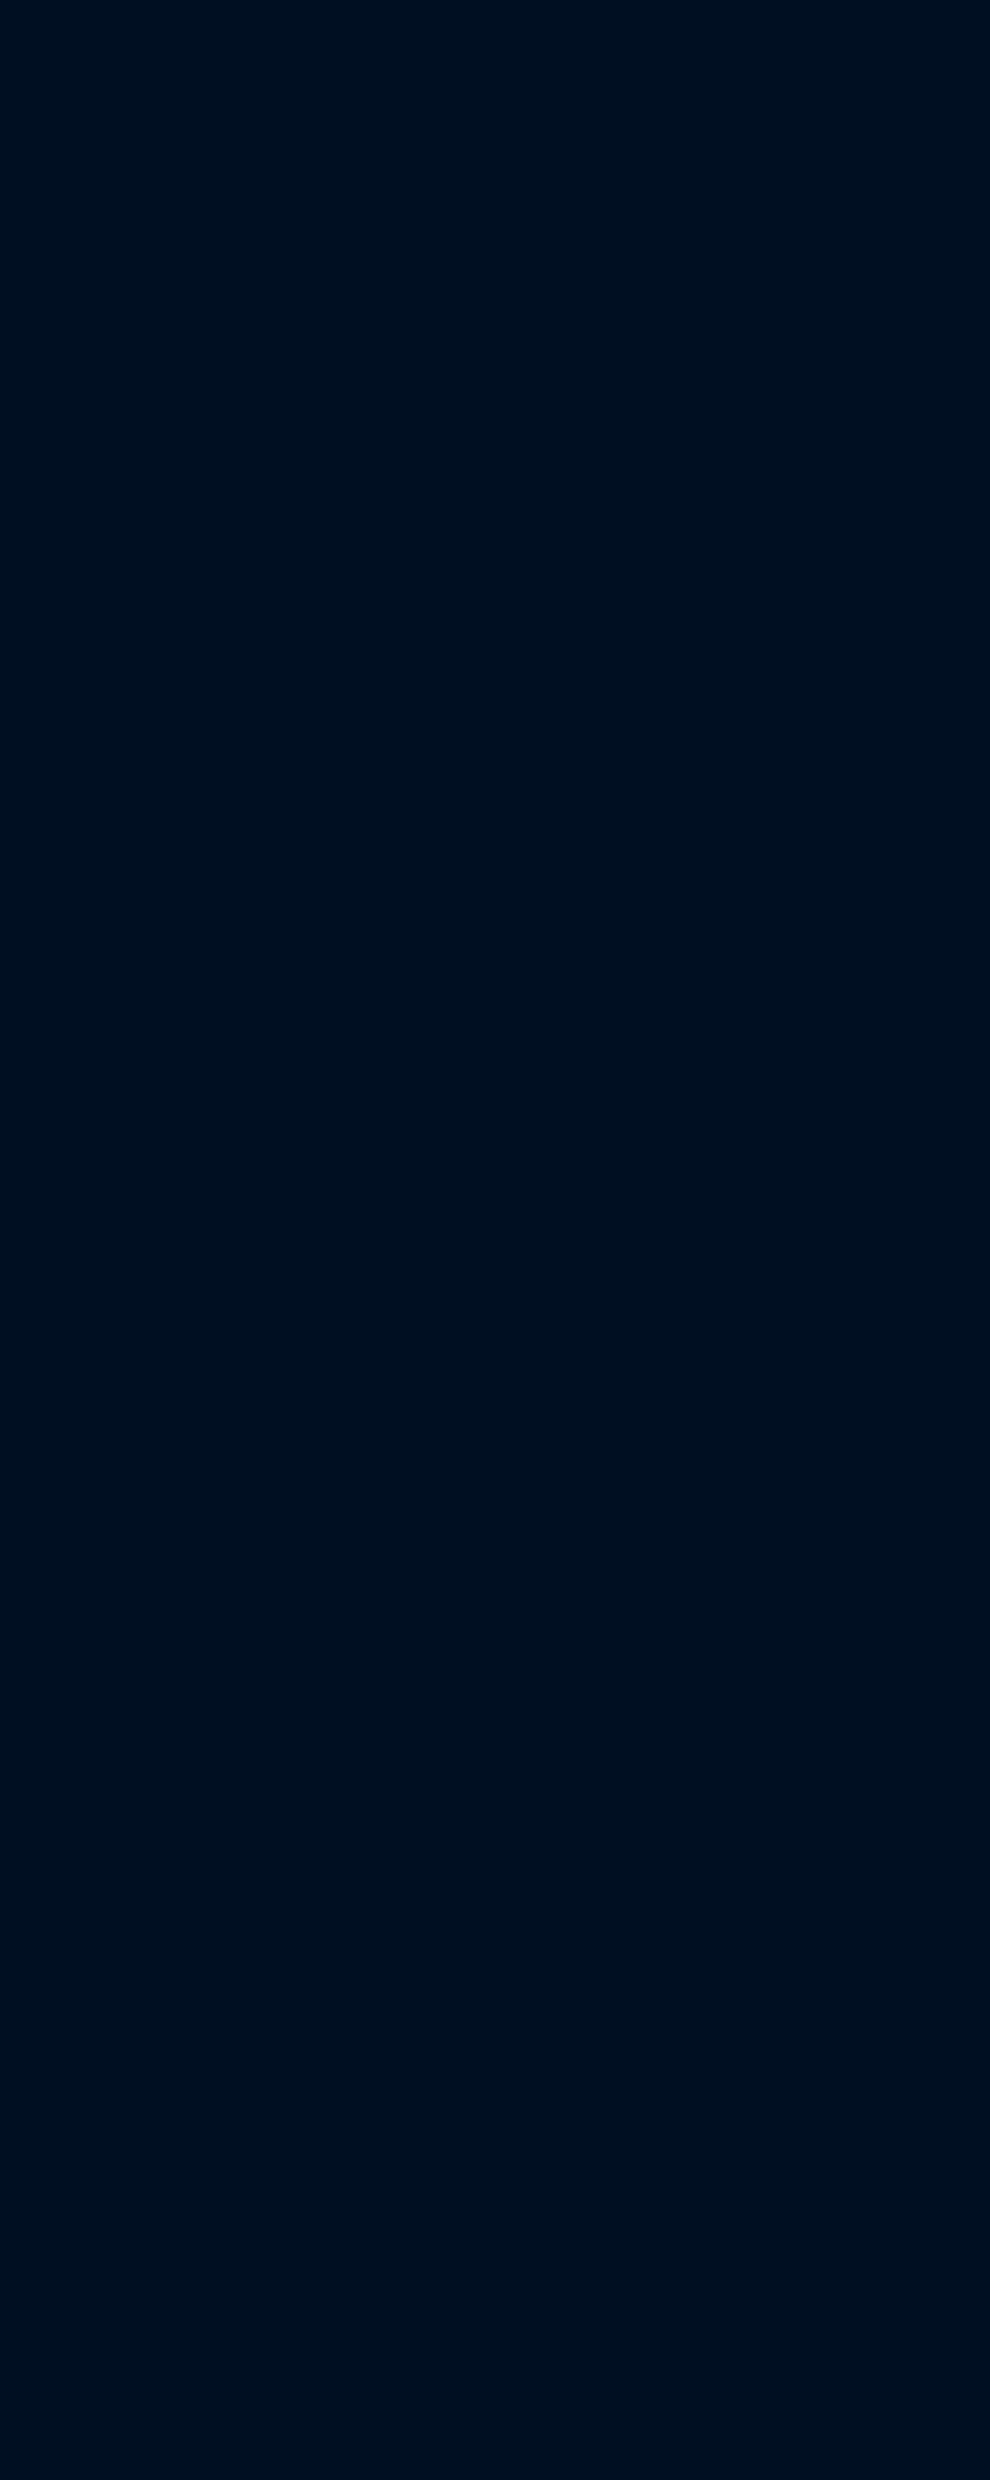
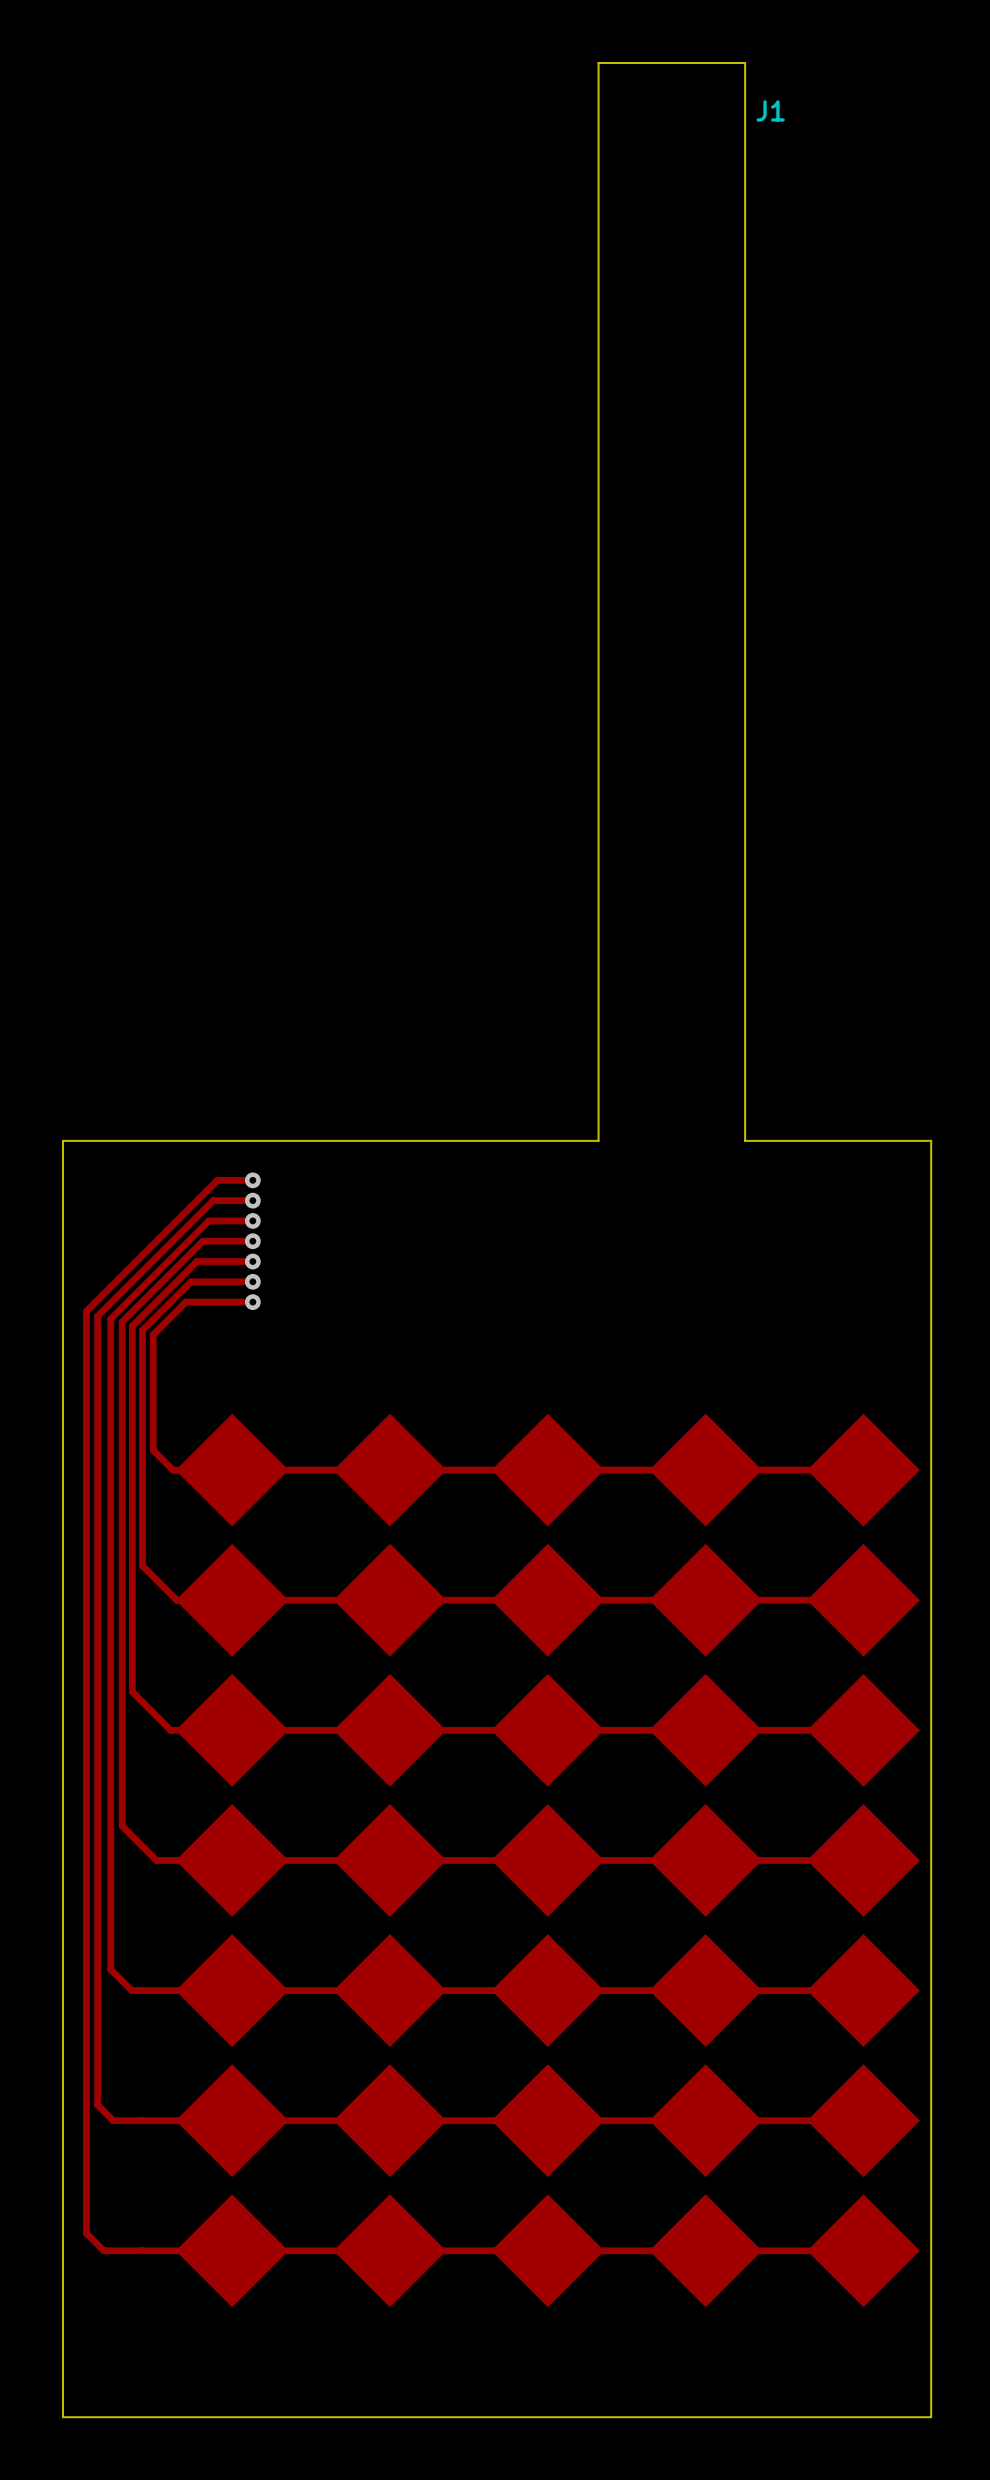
board edge: none -> (598, 62) (745, 62) (745, 1140) (931, 1140) (931, 2417) (62, 2417) (62, 1140) (598, 1140) (598, 62)
J1: none -> (770, 110)
track: none -> (252, 1180) (217, 1180) (86, 1311) (86, 2233) (103, 2250) (863, 2250)
via: none -> (252, 1180)
track: none -> (252, 1200) (213, 1200) (97, 1316) (97, 2105) (113, 2120) (863, 2120)
via: none -> (252, 1200)
track: none -> (252, 1220) (208, 1220) (110, 1319) (110, 1969) (131, 1990) (863, 1990)
via: none -> (252, 1220)
track: none -> (252, 1241) (202, 1241) (122, 1321) (122, 1826) (156, 1860) (863, 1860)
via: none -> (252, 1241)
track: none -> (252, 1261) (196, 1261) (132, 1326) (132, 1691) (170, 1730) (863, 1730)
via: none -> (252, 1261)
track: none -> (252, 1281) (191, 1281) (142, 1330) (142, 1565) (176, 1600) (863, 1600)
via: none -> (252, 1281)
track: none -> (252, 1302) (185, 1302) (153, 1334) (153, 1450) (173, 1470) (863, 1470)
via: none -> (252, 1302)
part: none -> (232, 1470)
part: none -> (389, 1470)
part: none -> (547, 1470)
part: none -> (705, 1470)
part: none -> (863, 1470)
part: none -> (232, 1600)
part: none -> (389, 1600)
part: none -> (547, 1600)
part: none -> (705, 1600)
part: none -> (863, 1600)
part: none -> (232, 1730)
part: none -> (389, 1730)
part: none -> (547, 1730)
part: none -> (705, 1730)
part: none -> (863, 1730)
part: none -> (232, 1860)
part: none -> (389, 1860)
part: none -> (547, 1860)
part: none -> (705, 1860)
part: none -> (863, 1860)
part: none -> (232, 1990)
part: none -> (389, 1990)
part: none -> (547, 1990)
part: none -> (705, 1990)
part: none -> (863, 1990)
part: none -> (232, 2120)
part: none -> (389, 2120)
part: none -> (547, 2120)
part: none -> (705, 2120)
part: none -> (863, 2120)
part: none -> (232, 2250)
part: none -> (389, 2250)
part: none -> (547, 2250)
part: none -> (705, 2250)
part: none -> (863, 2250)

